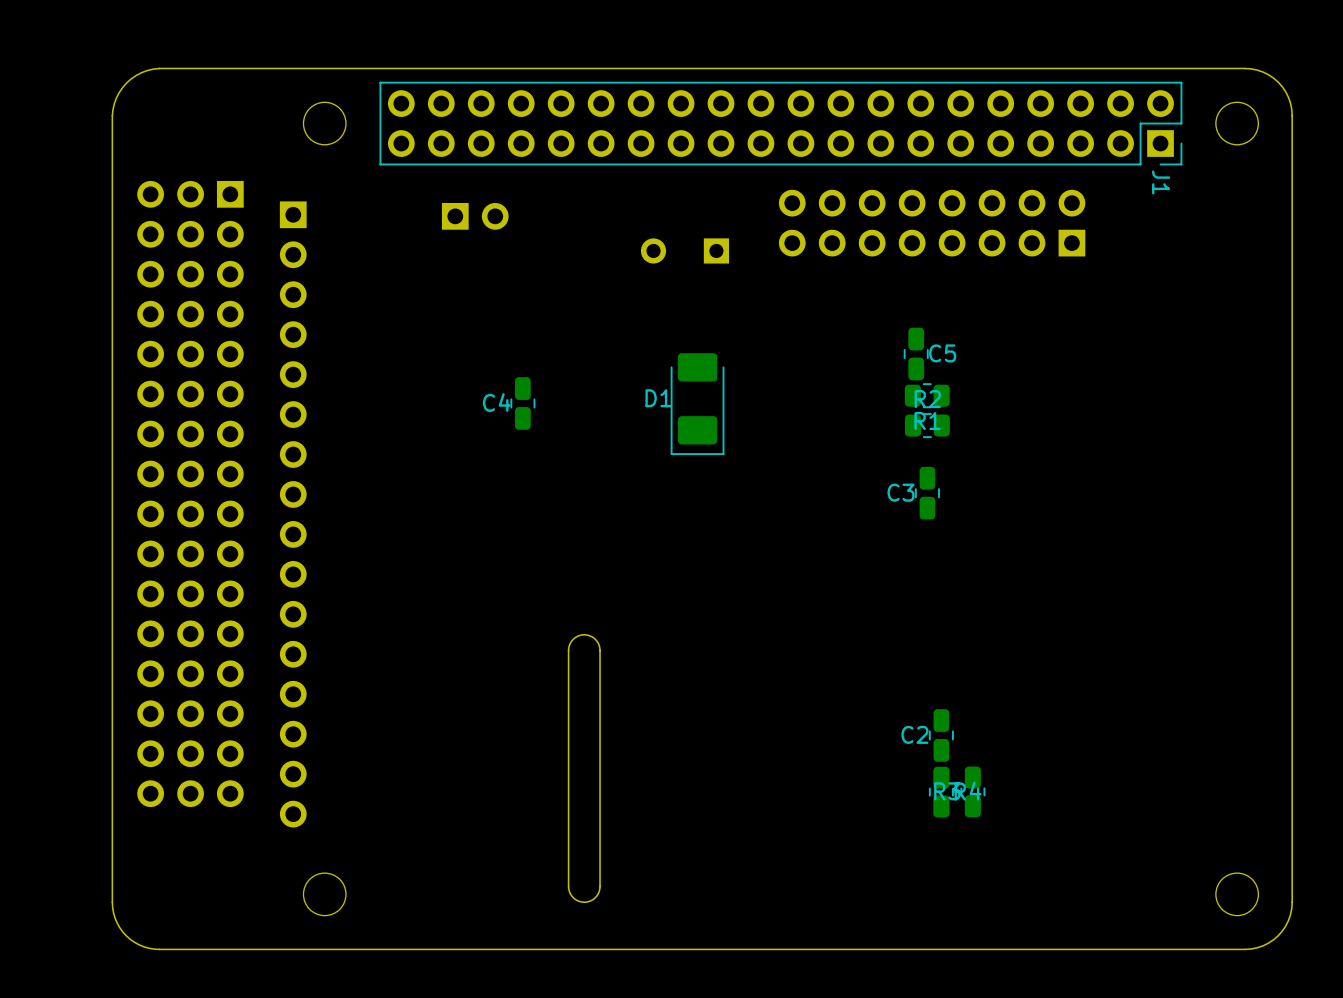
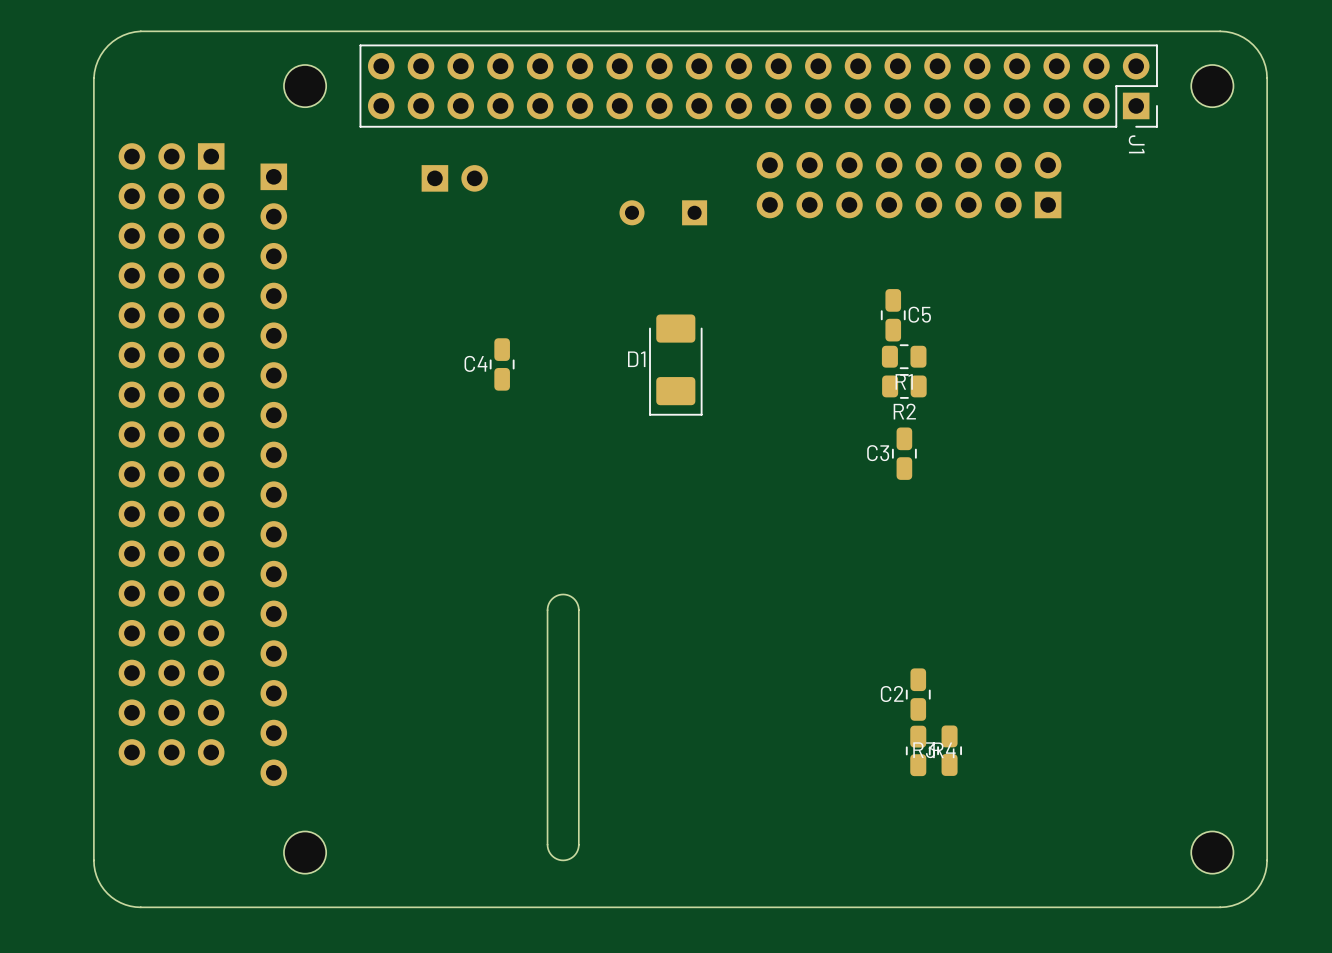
R2 name position: R2 (927, 399) -> R2 (904, 411)

